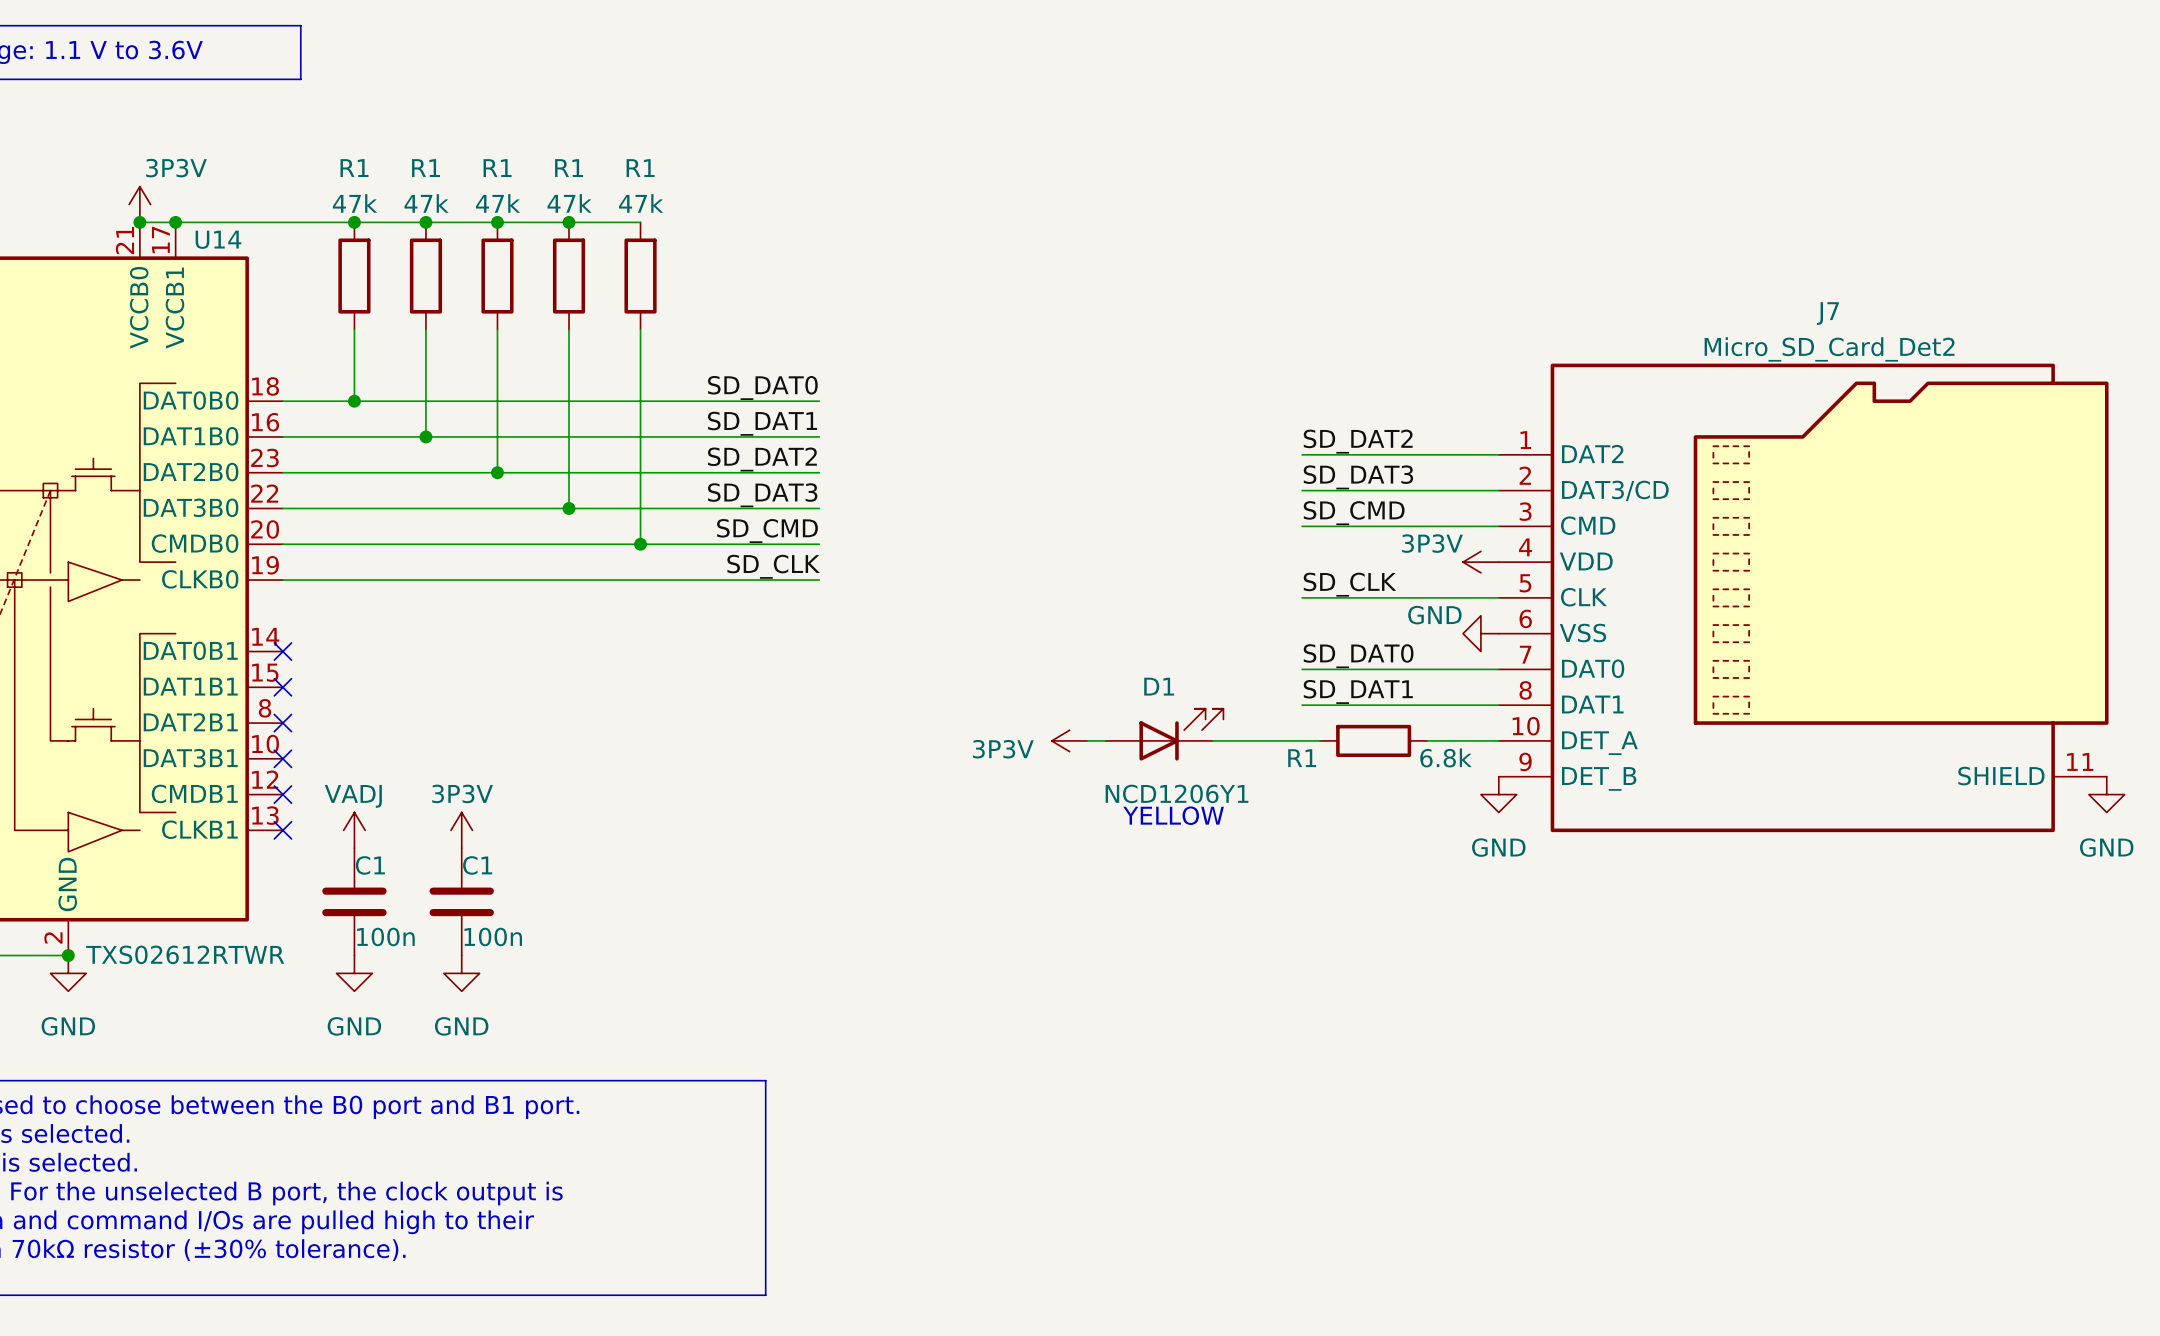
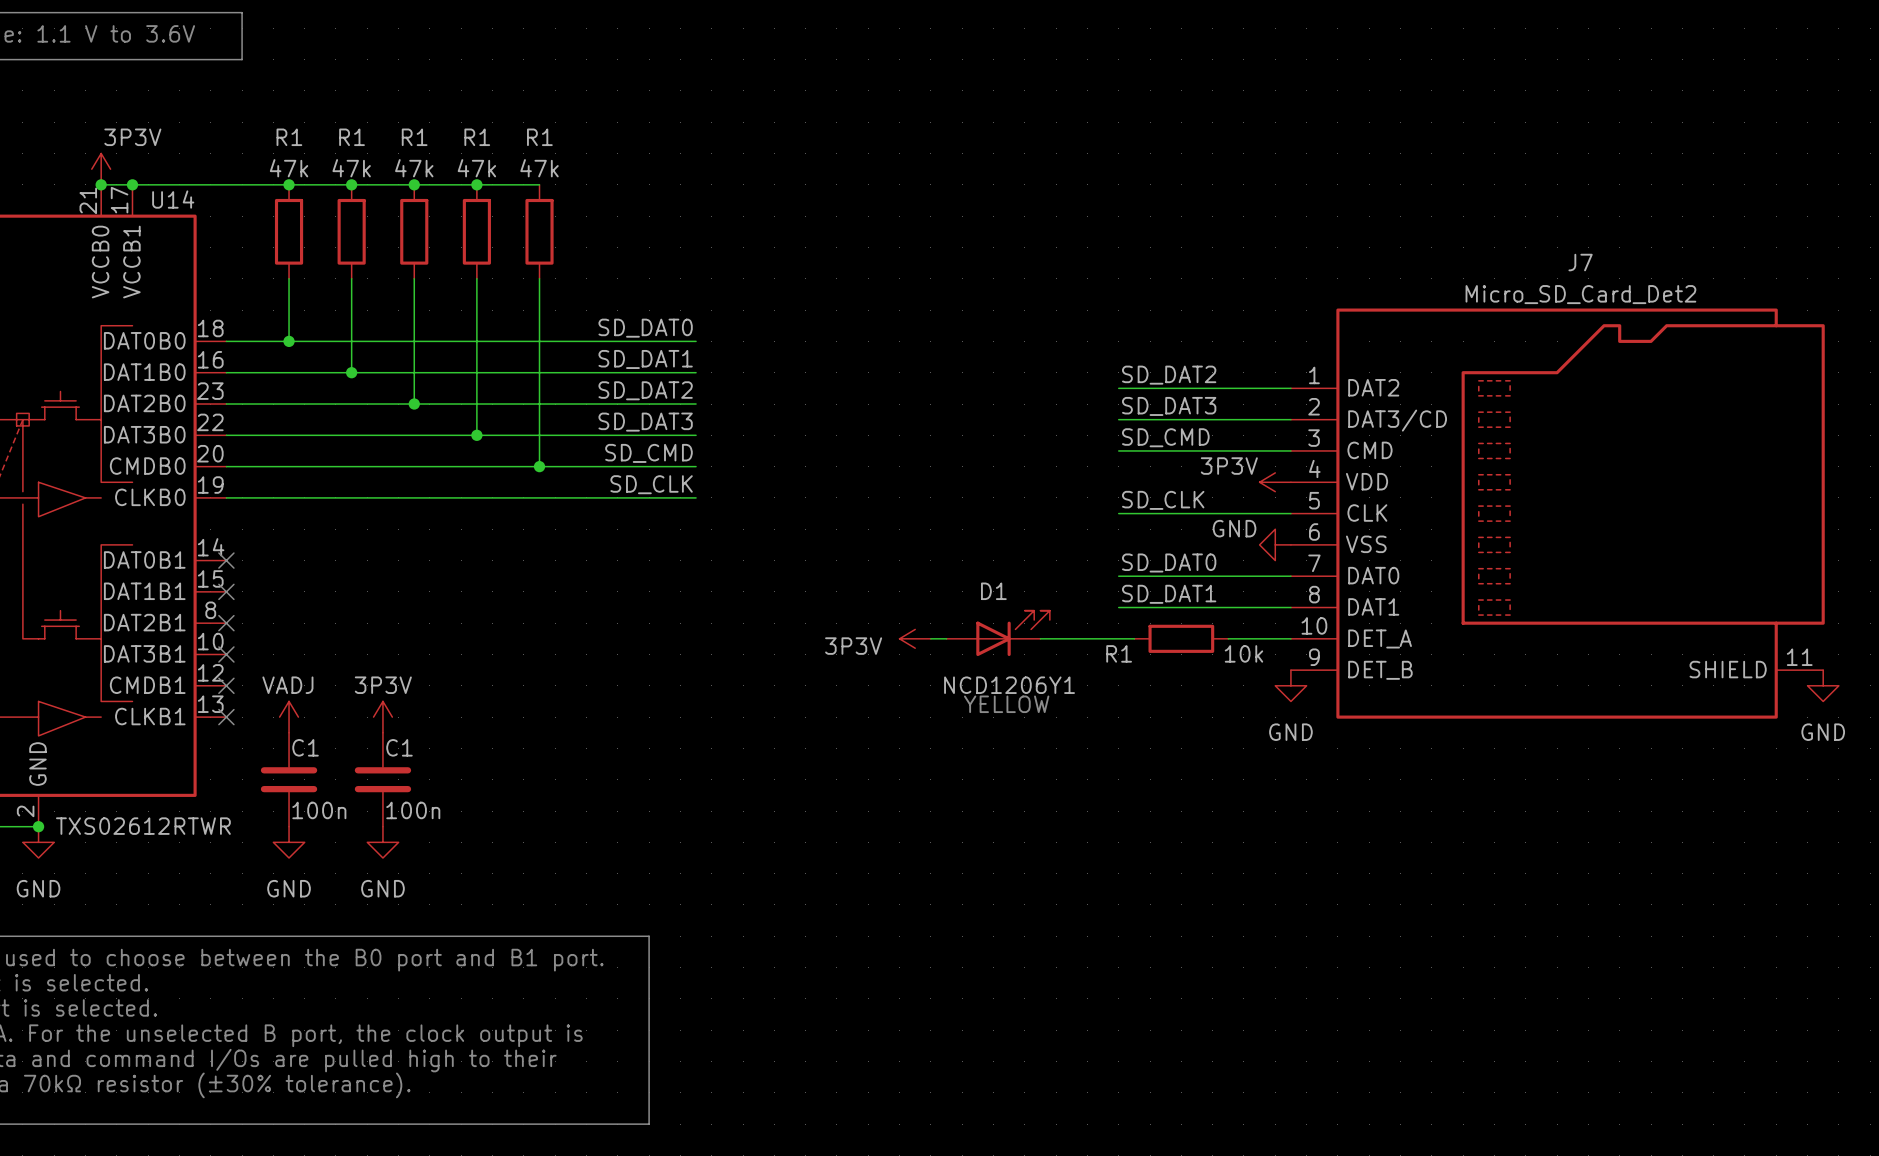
R1 value: 6.8k (1445, 757) -> 10k (1243, 653)

